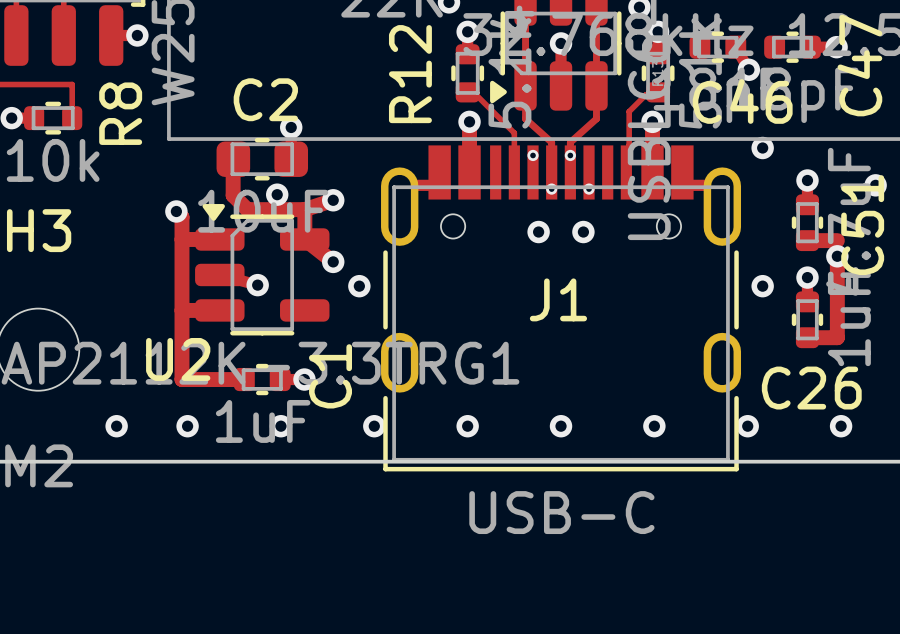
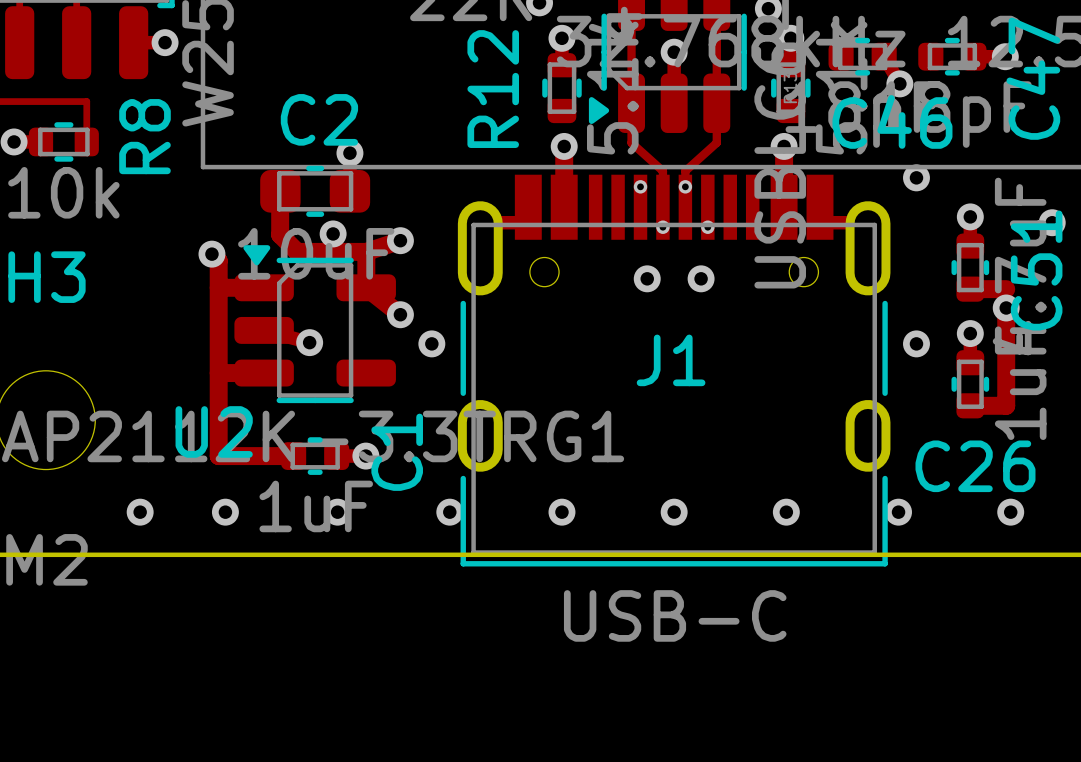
track: (467, 92) (473, 92) (514, 133) (514, 172) -> none
track: (658, 92) (645, 94) (629, 111) (629, 145) (626, 172) -> none

